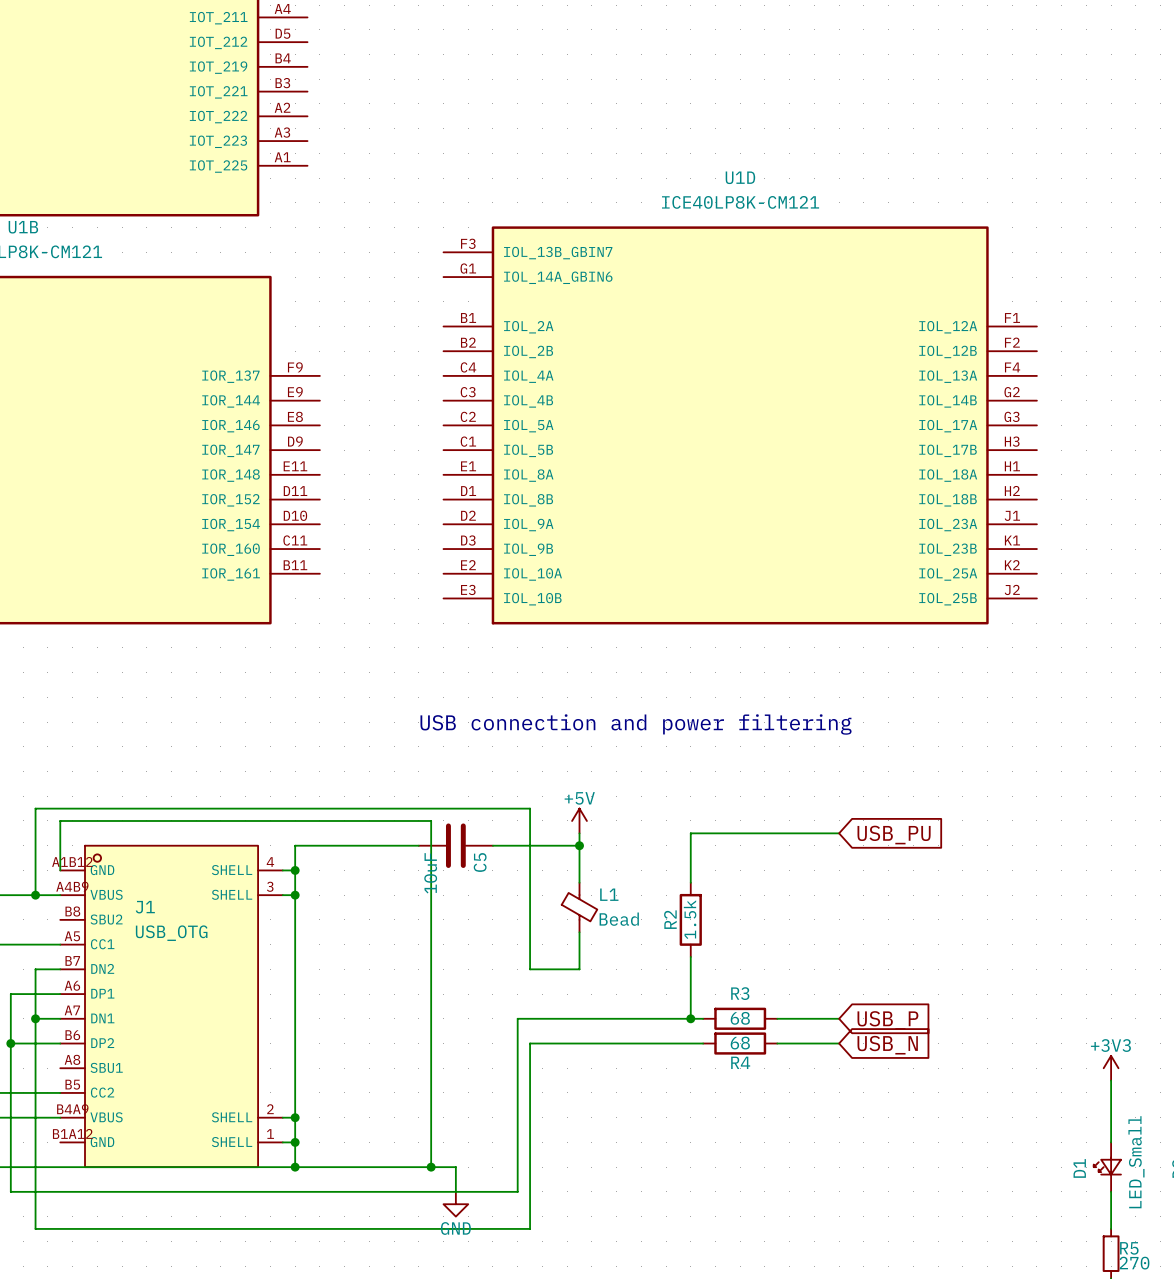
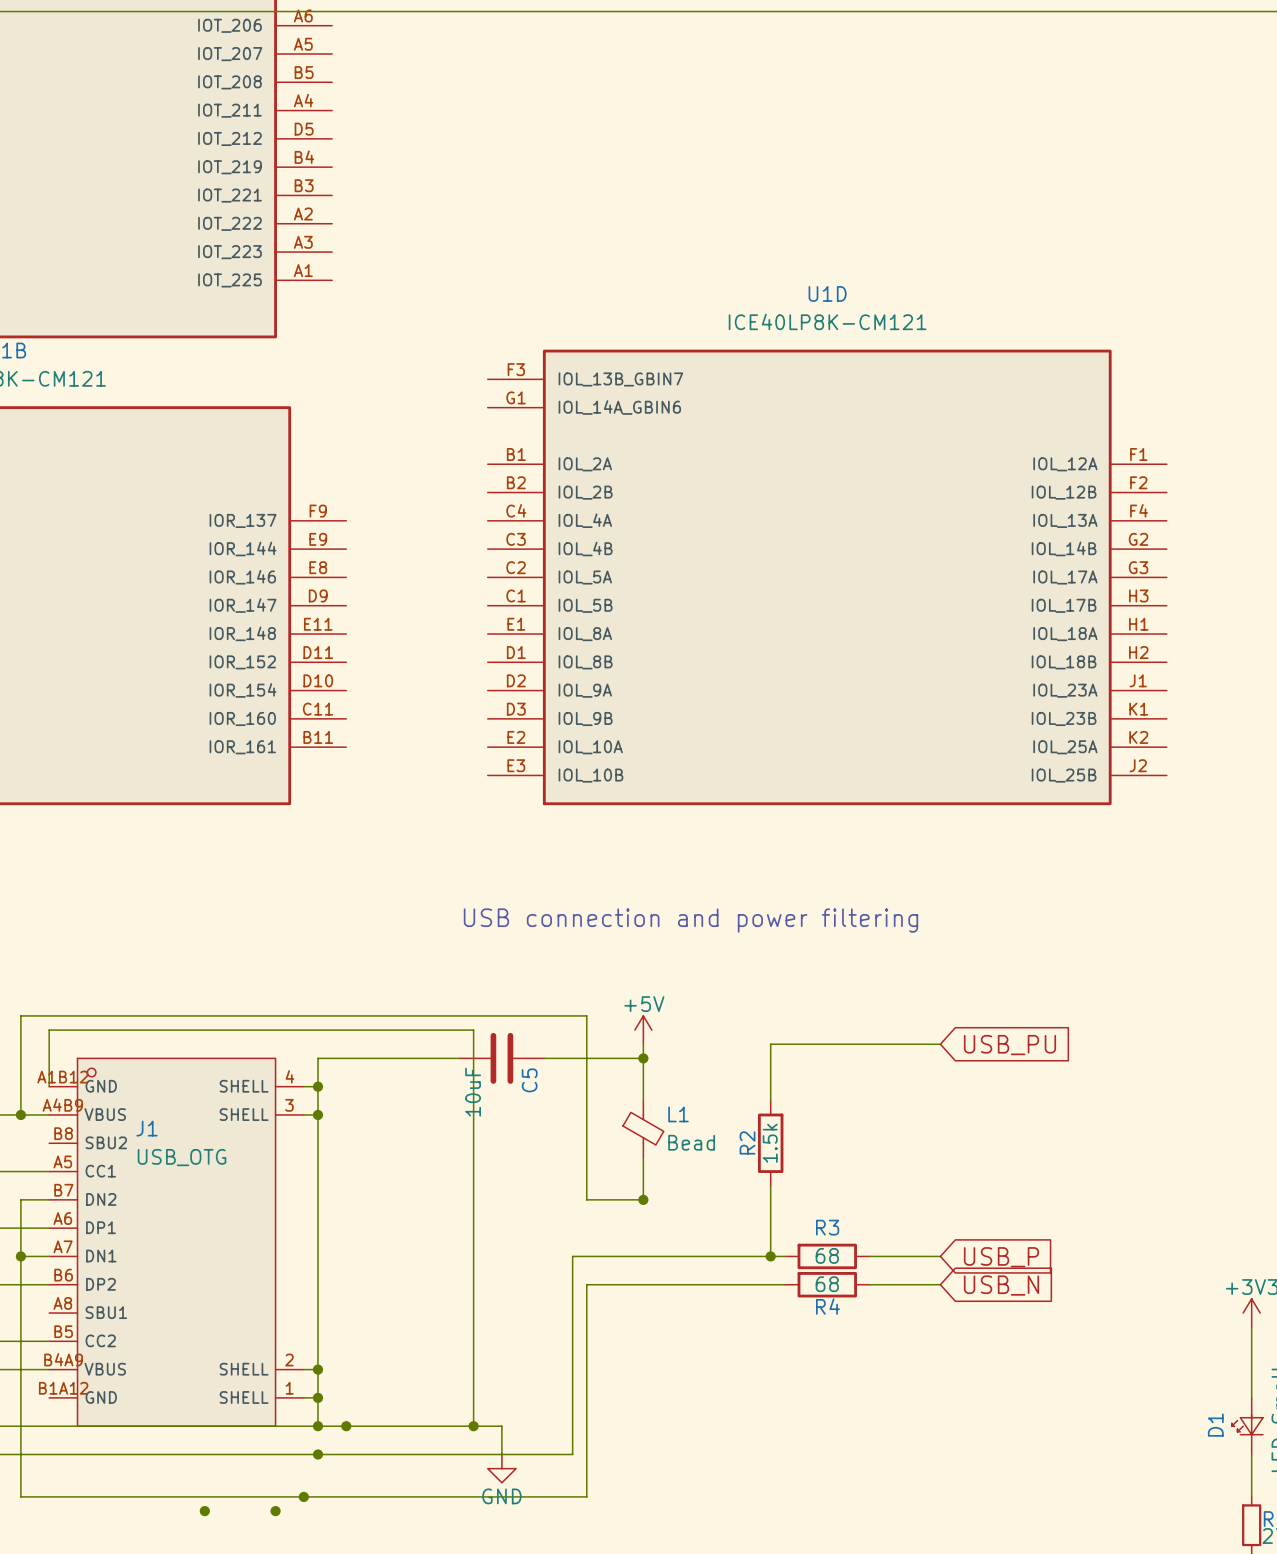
junction: none -> (643, 1199)
junction: none -> (346, 1426)
junction: none -> (318, 1454)
junction: none -> (303, 1496)
junction: none -> (204, 1511)
junction: none -> (275, 1511)

